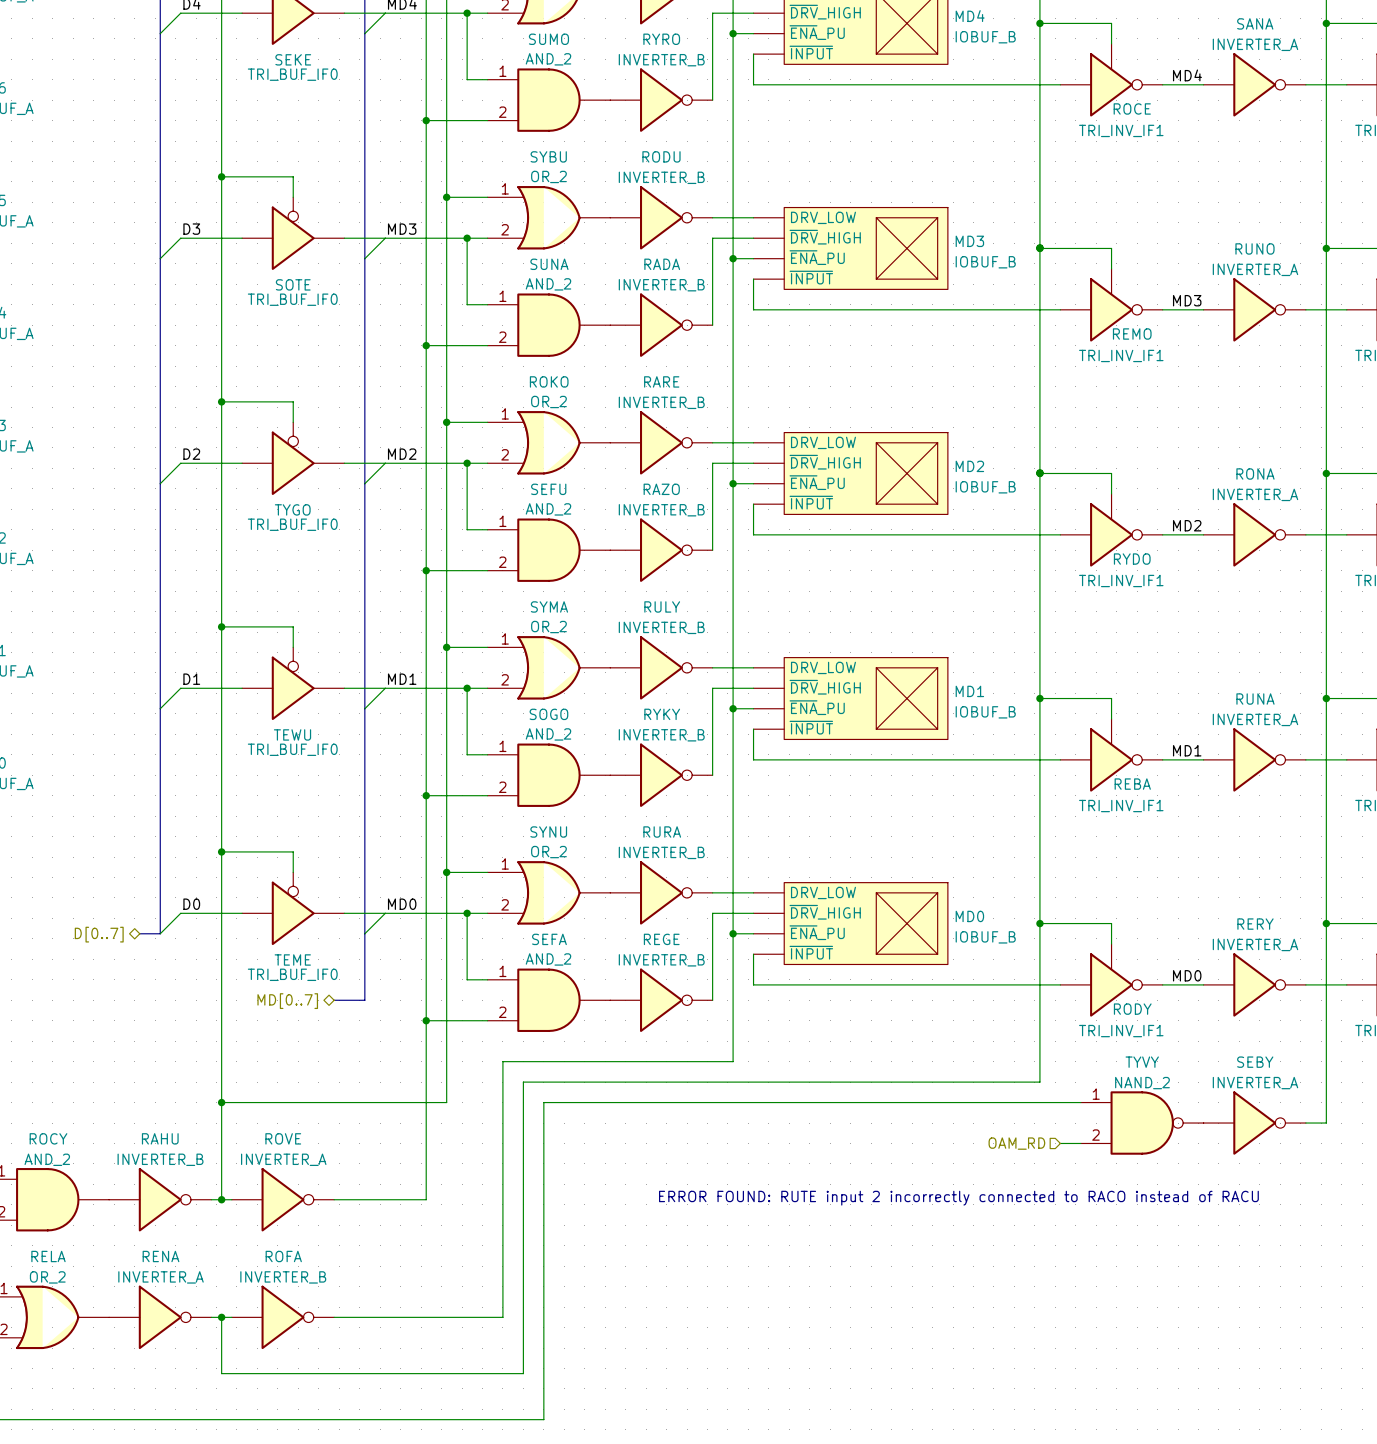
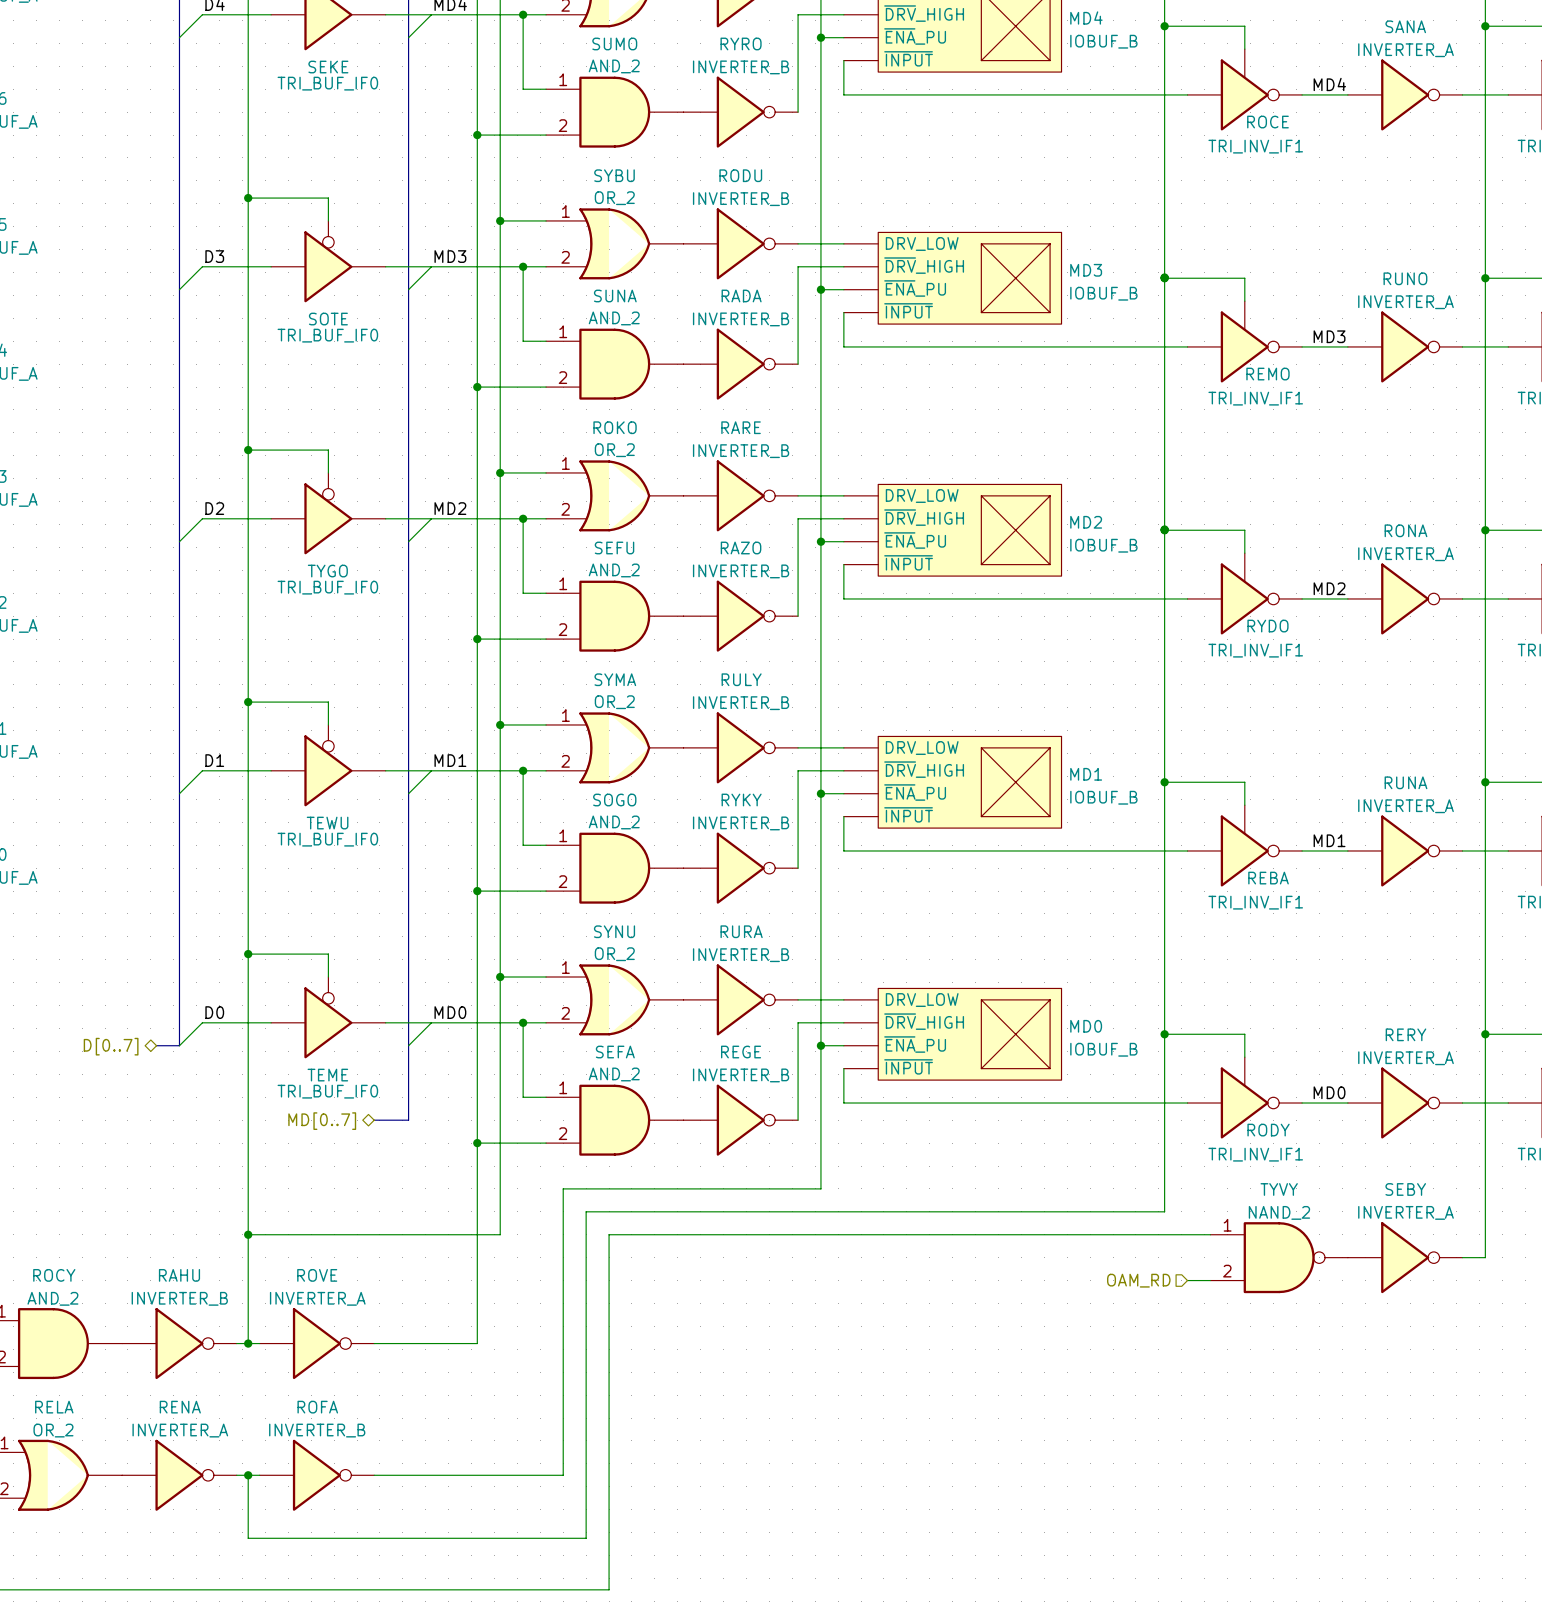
text: ERROR FOUND: RUTE input 2 incorrectly connected to RACO instead of RACU (958, 1198) -> none

